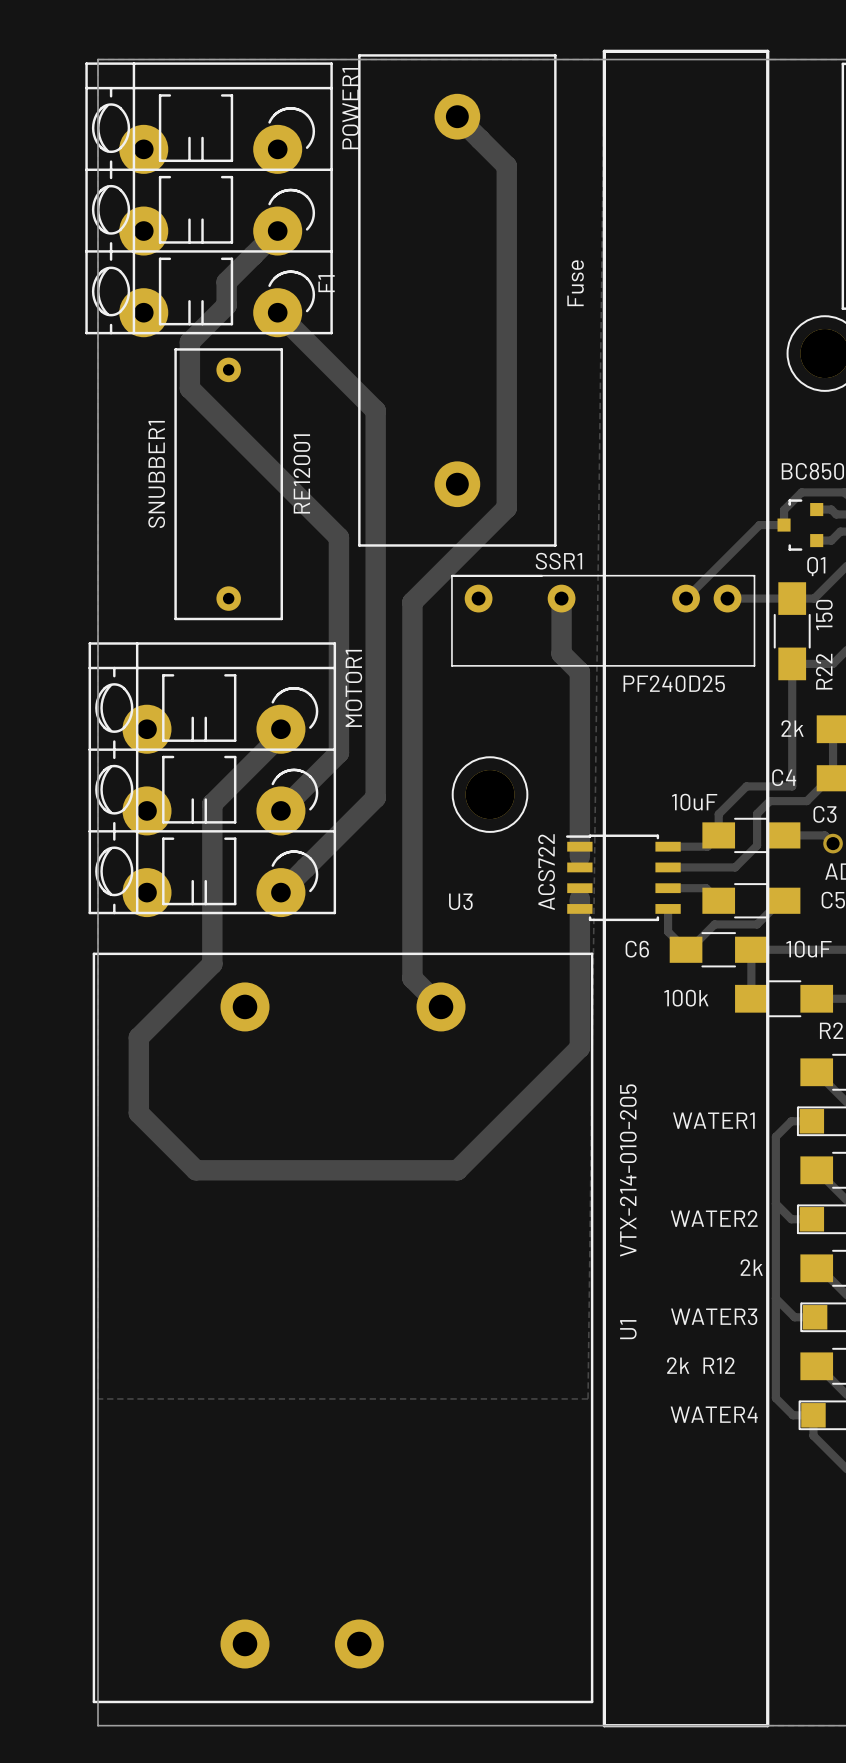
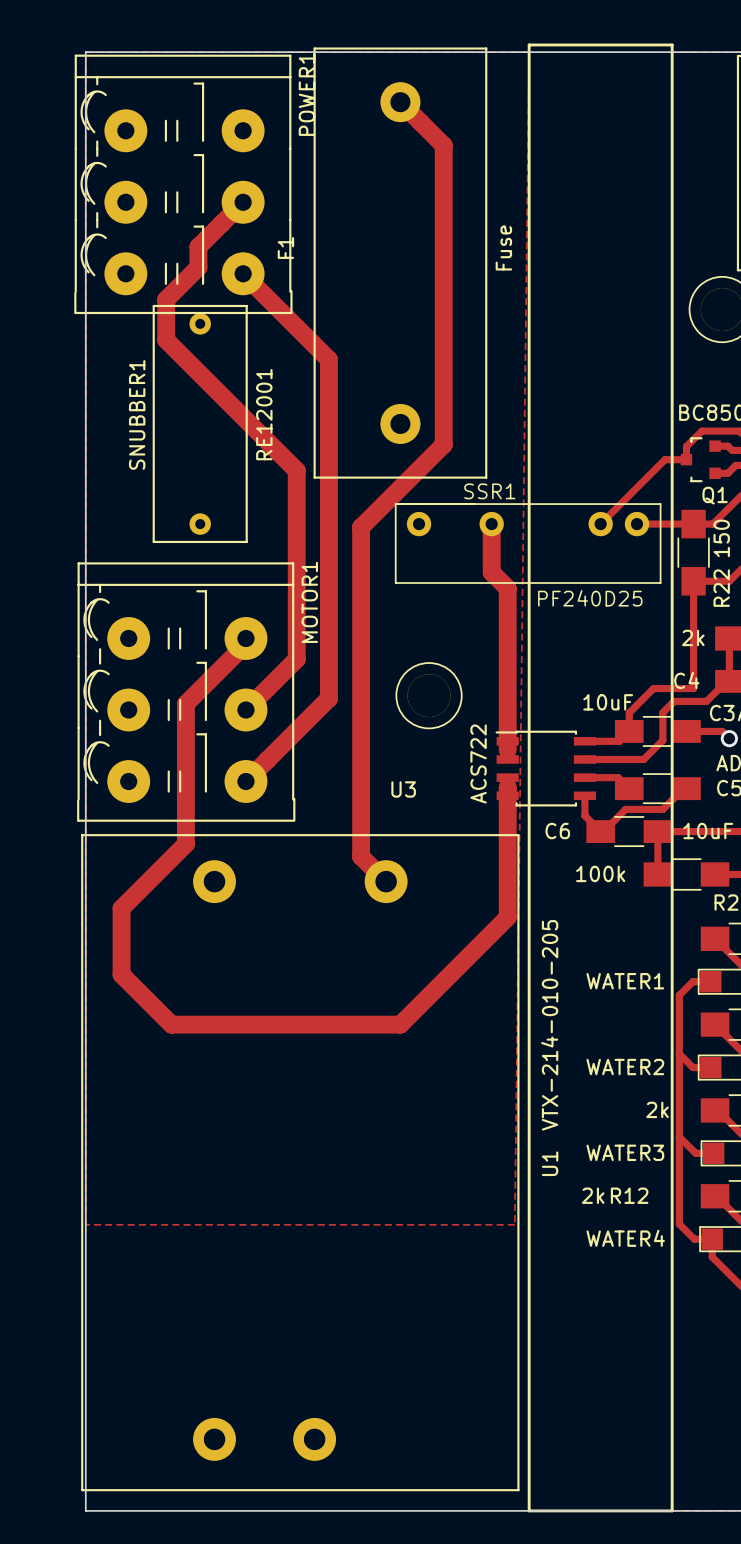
POWER1 footprint: [85, 62, 333, 338] -> [74, 54, 293, 315]
MOTOR1 footprint: [88, 642, 337, 918] -> [77, 562, 296, 822]

